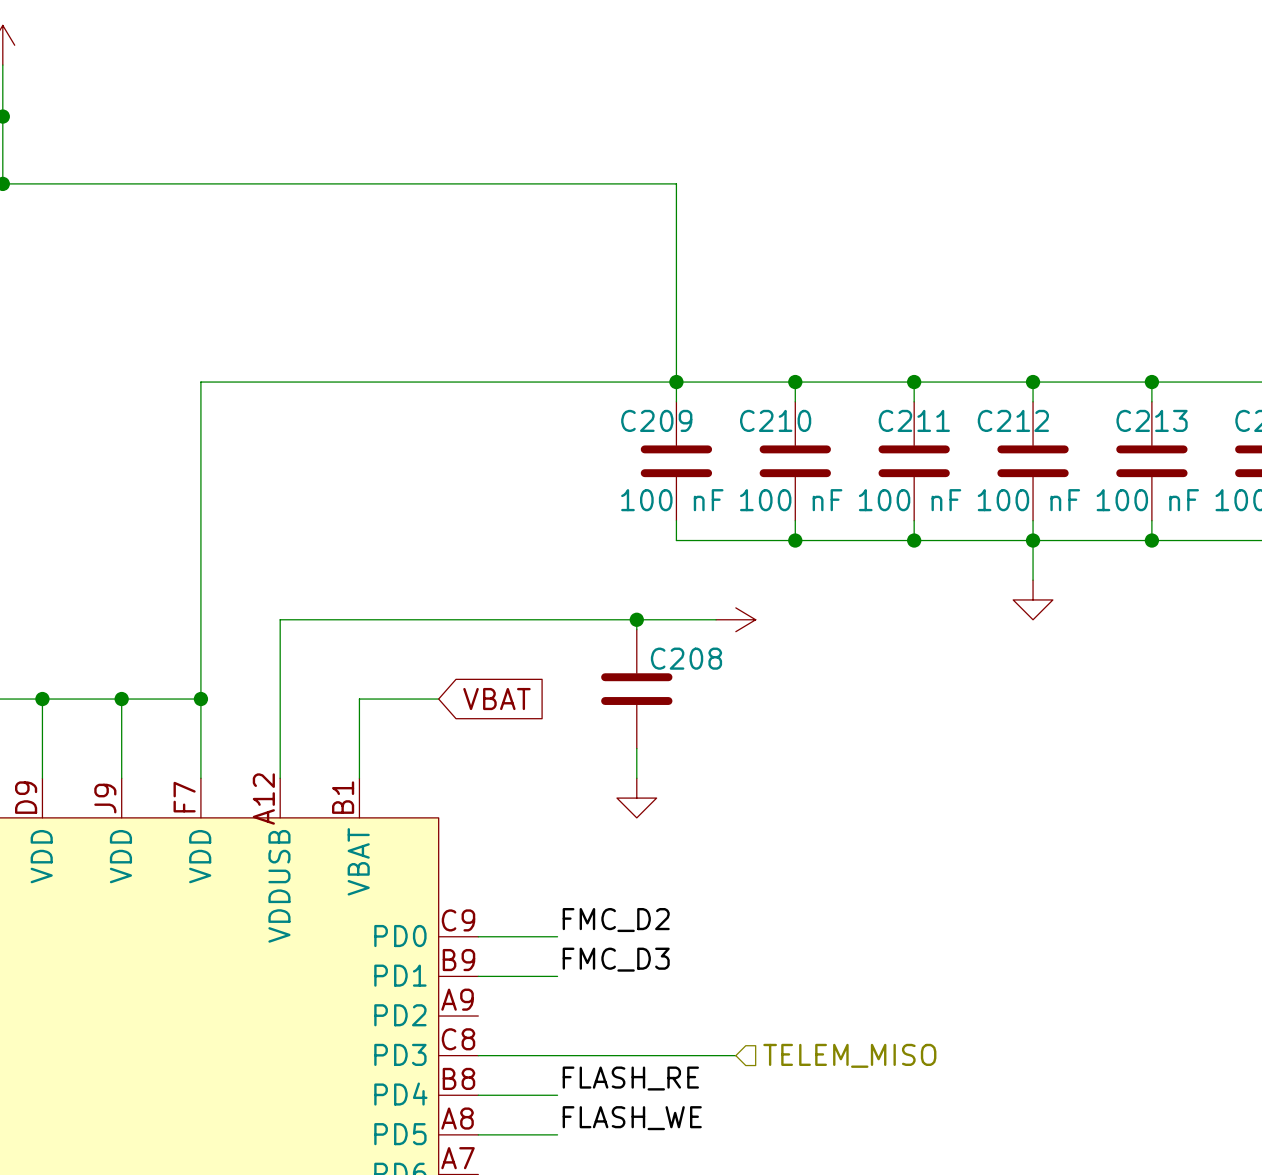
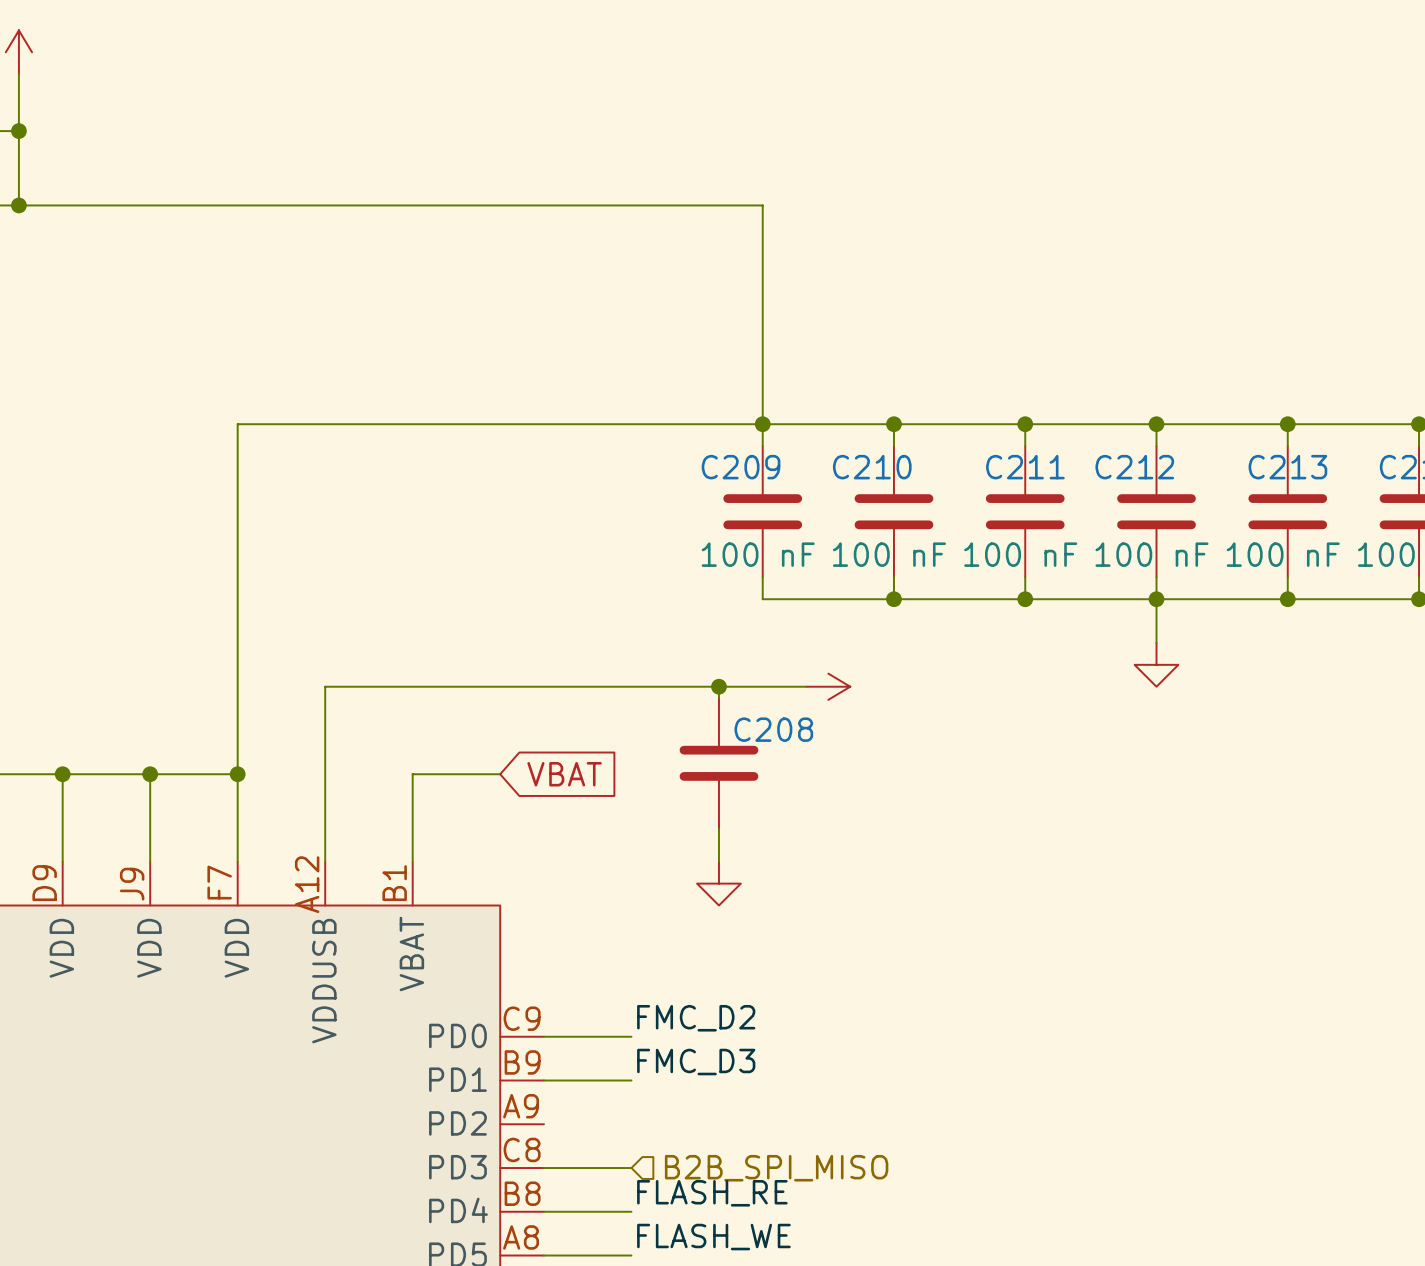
wire: (557, 1055) (735, 1055) -> none
hierarchical label: none -> B2B_SPI_MISO (776, 1168)
hierarchical label: TELEM_MISO (849, 1055) -> none

